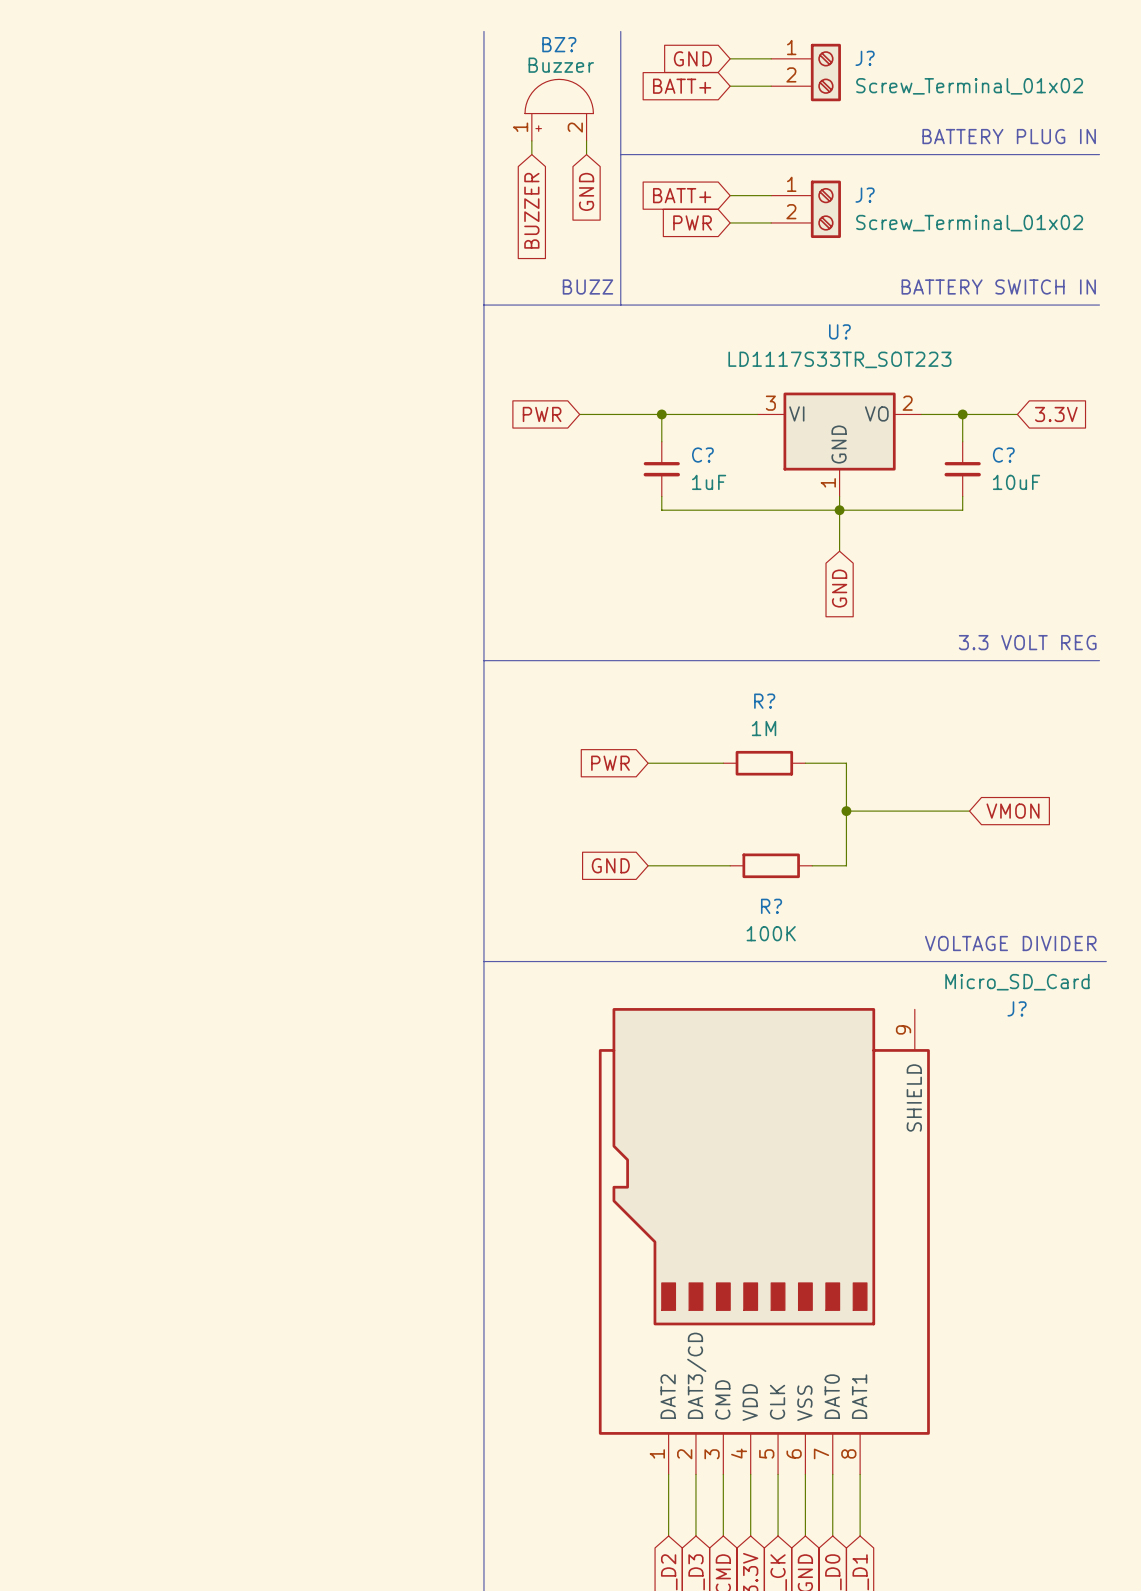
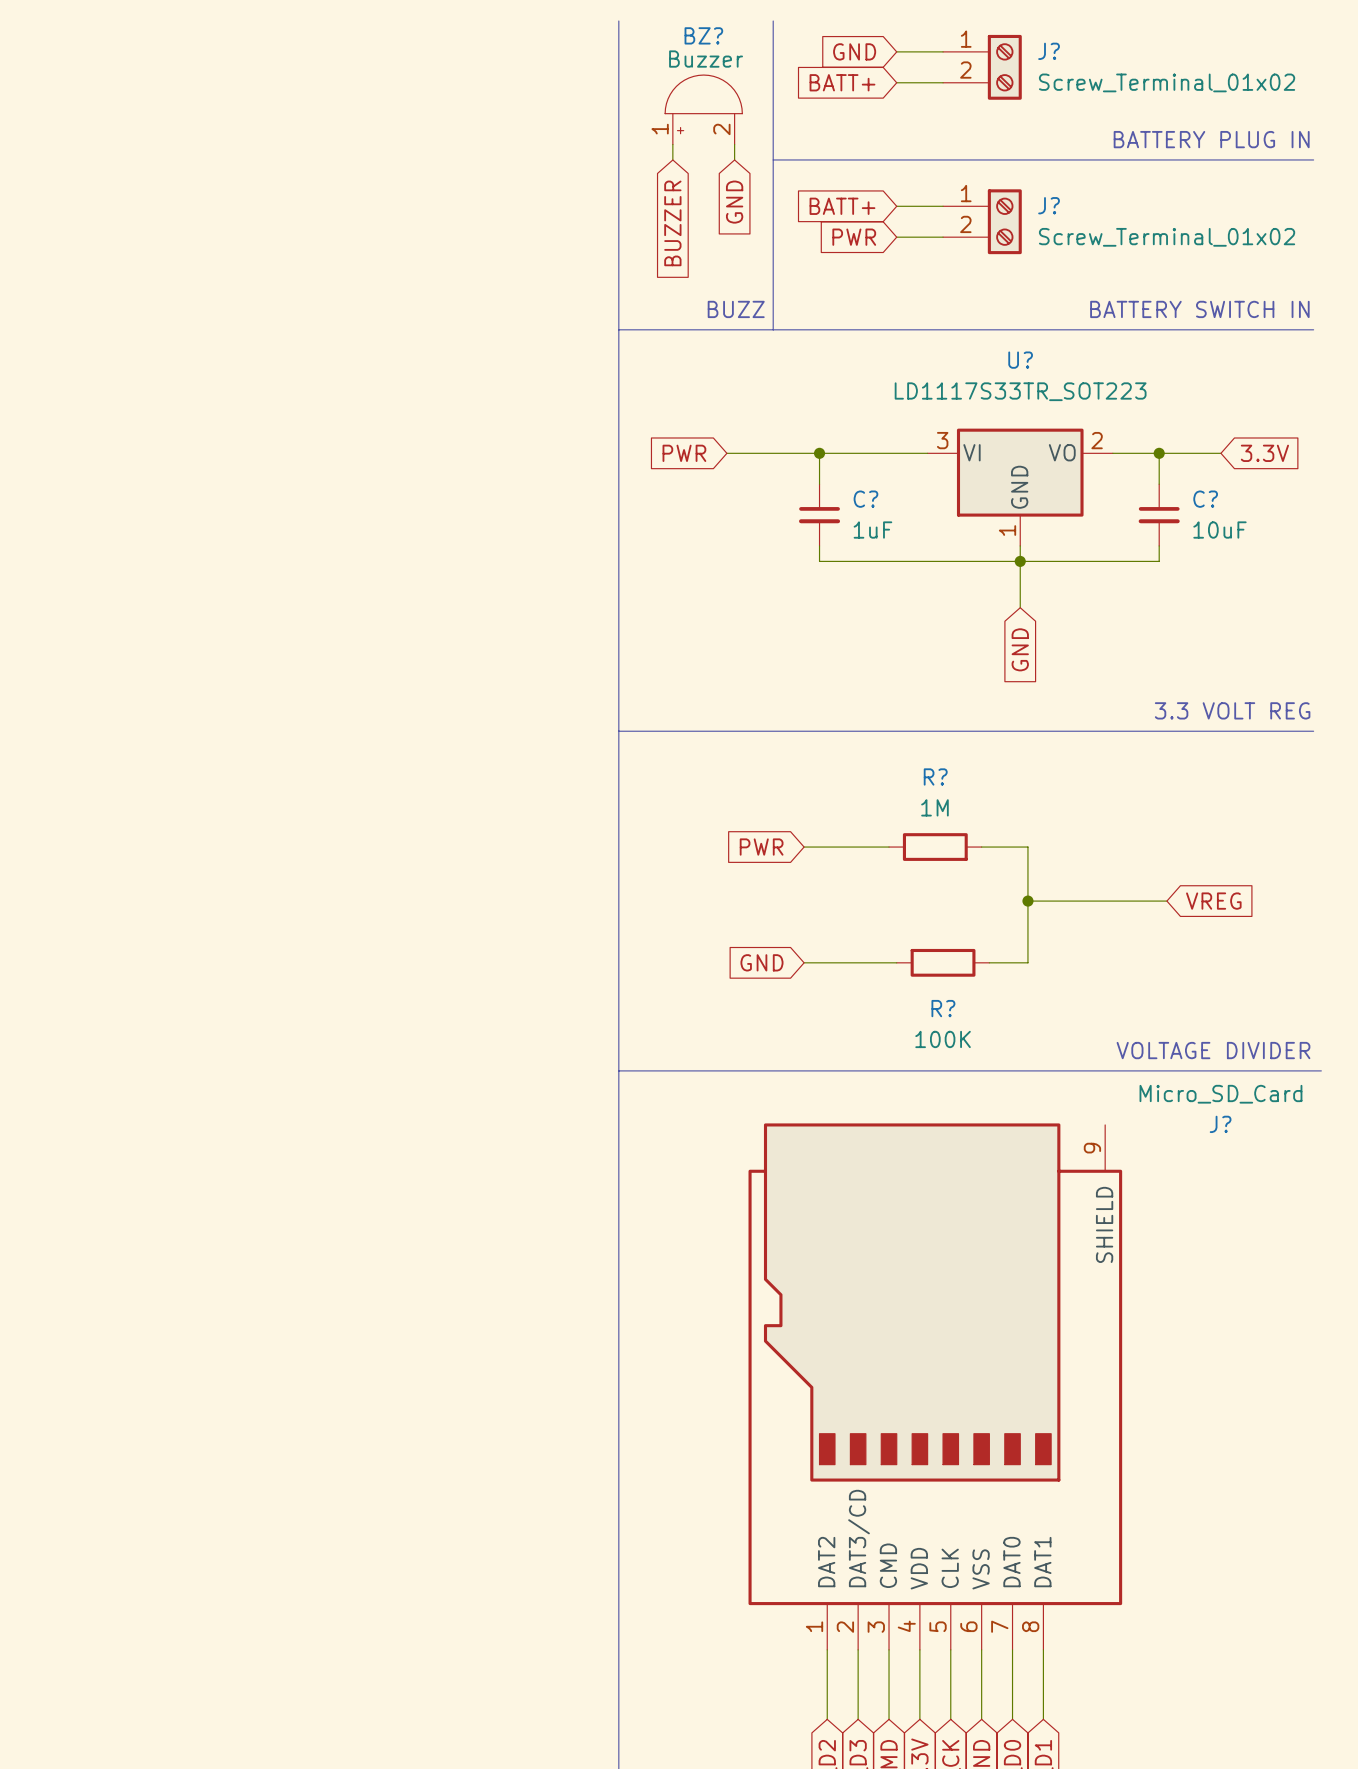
global label: VMON (1013, 811) -> VREG (1213, 901)

